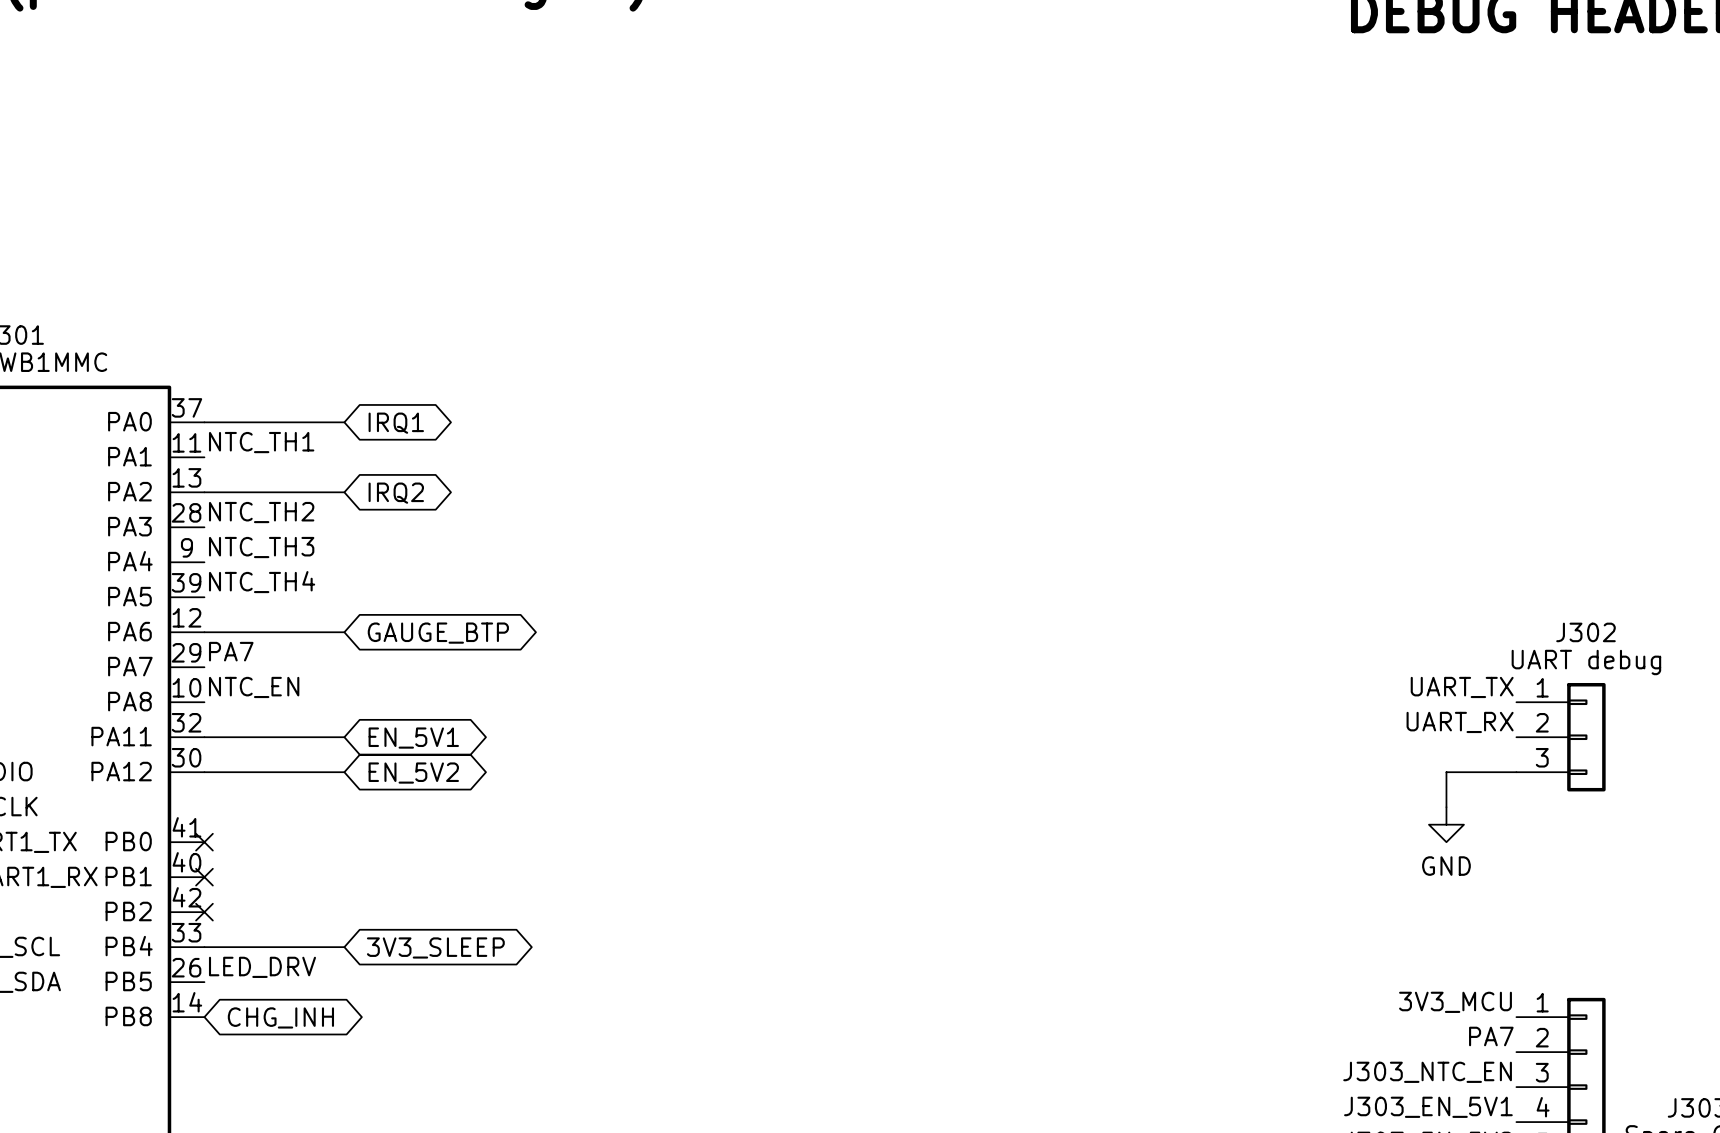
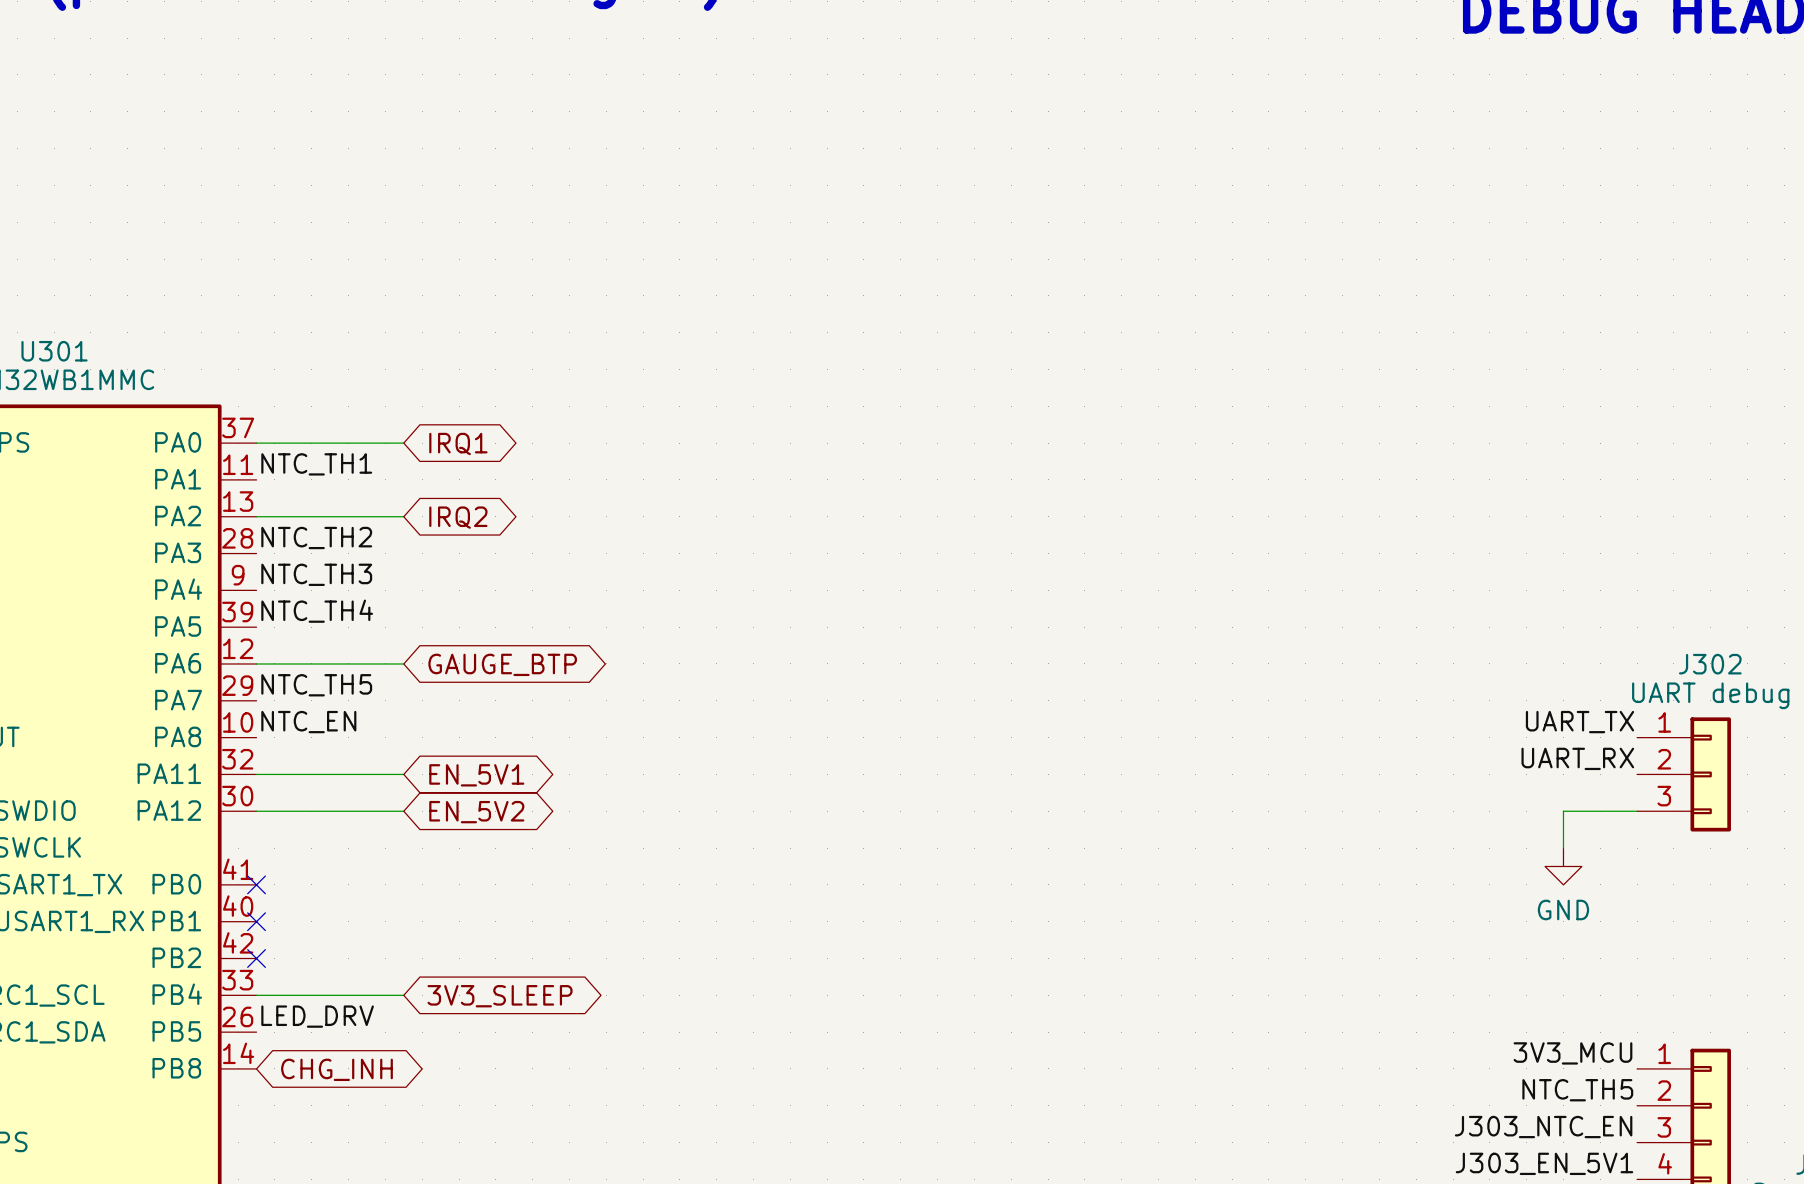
label: PA7 (231, 651) -> NTC_TH5 (316, 685)
label: PA7 (1491, 1036) -> NTC_TH5 (1577, 1090)

